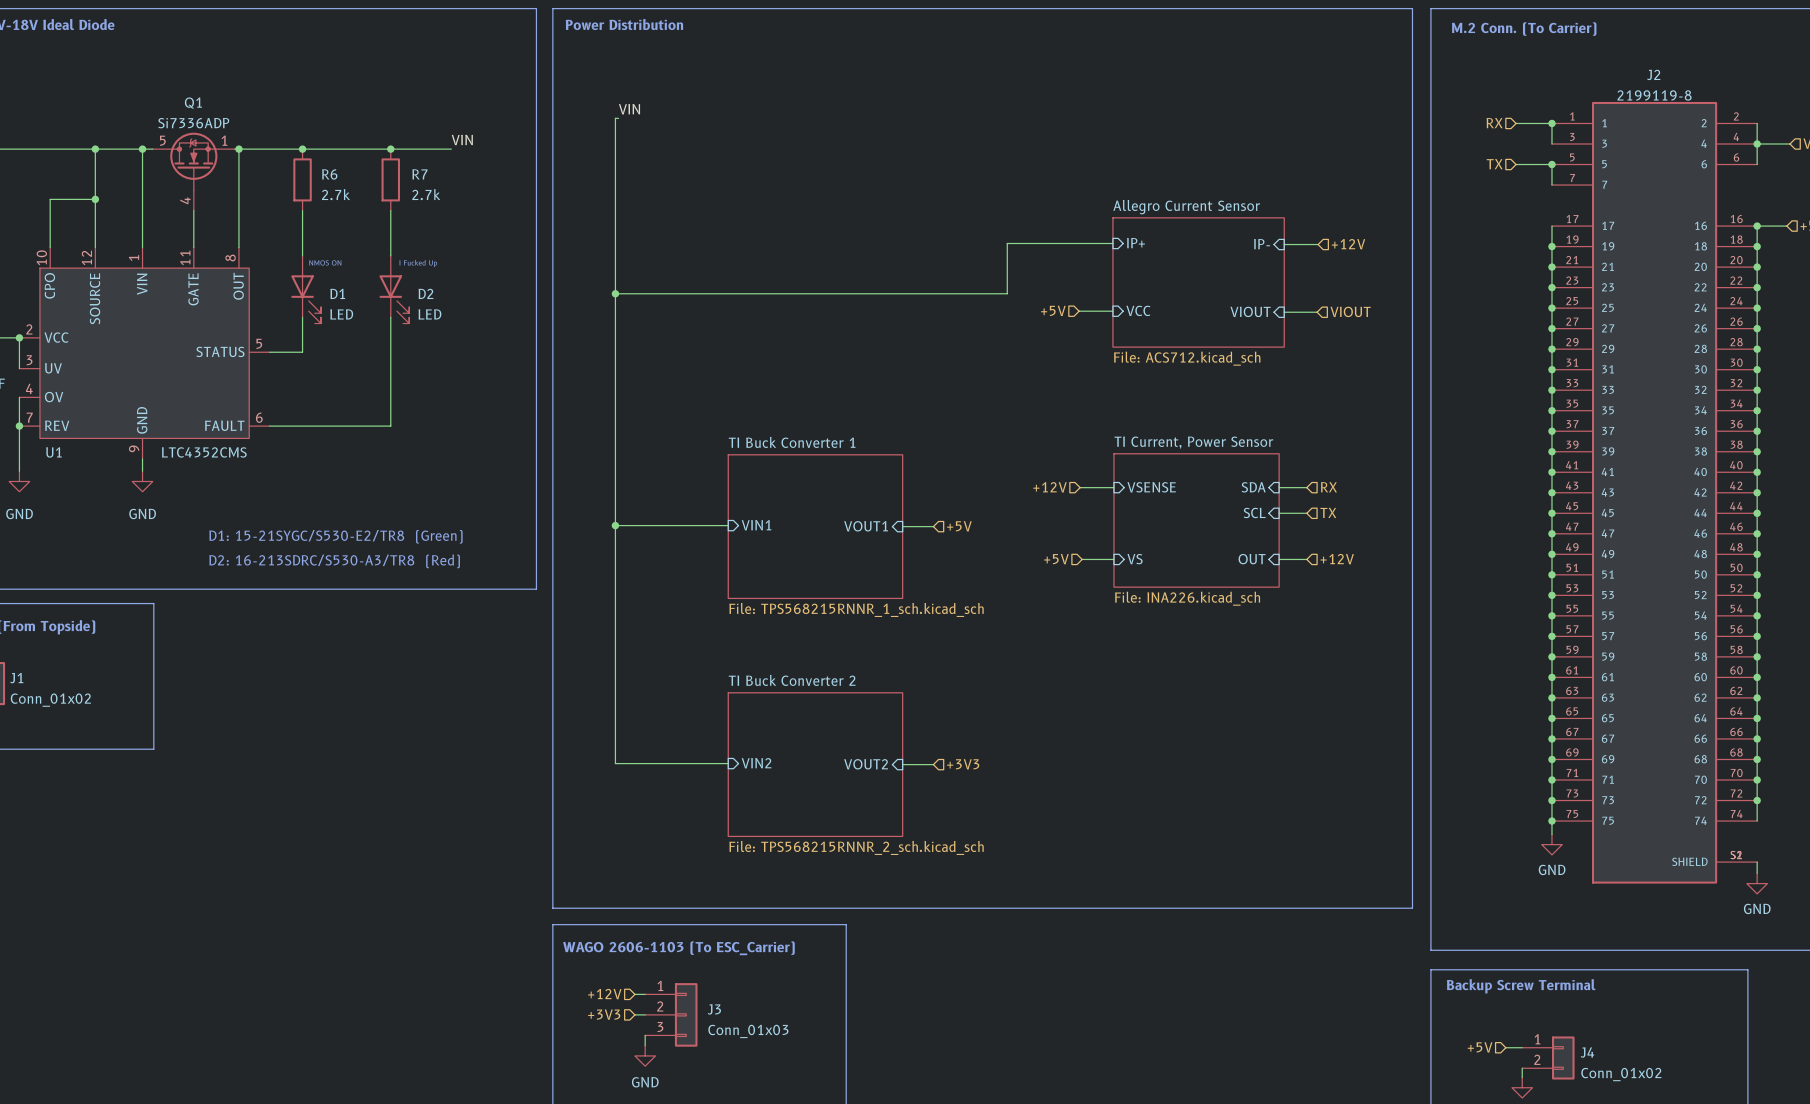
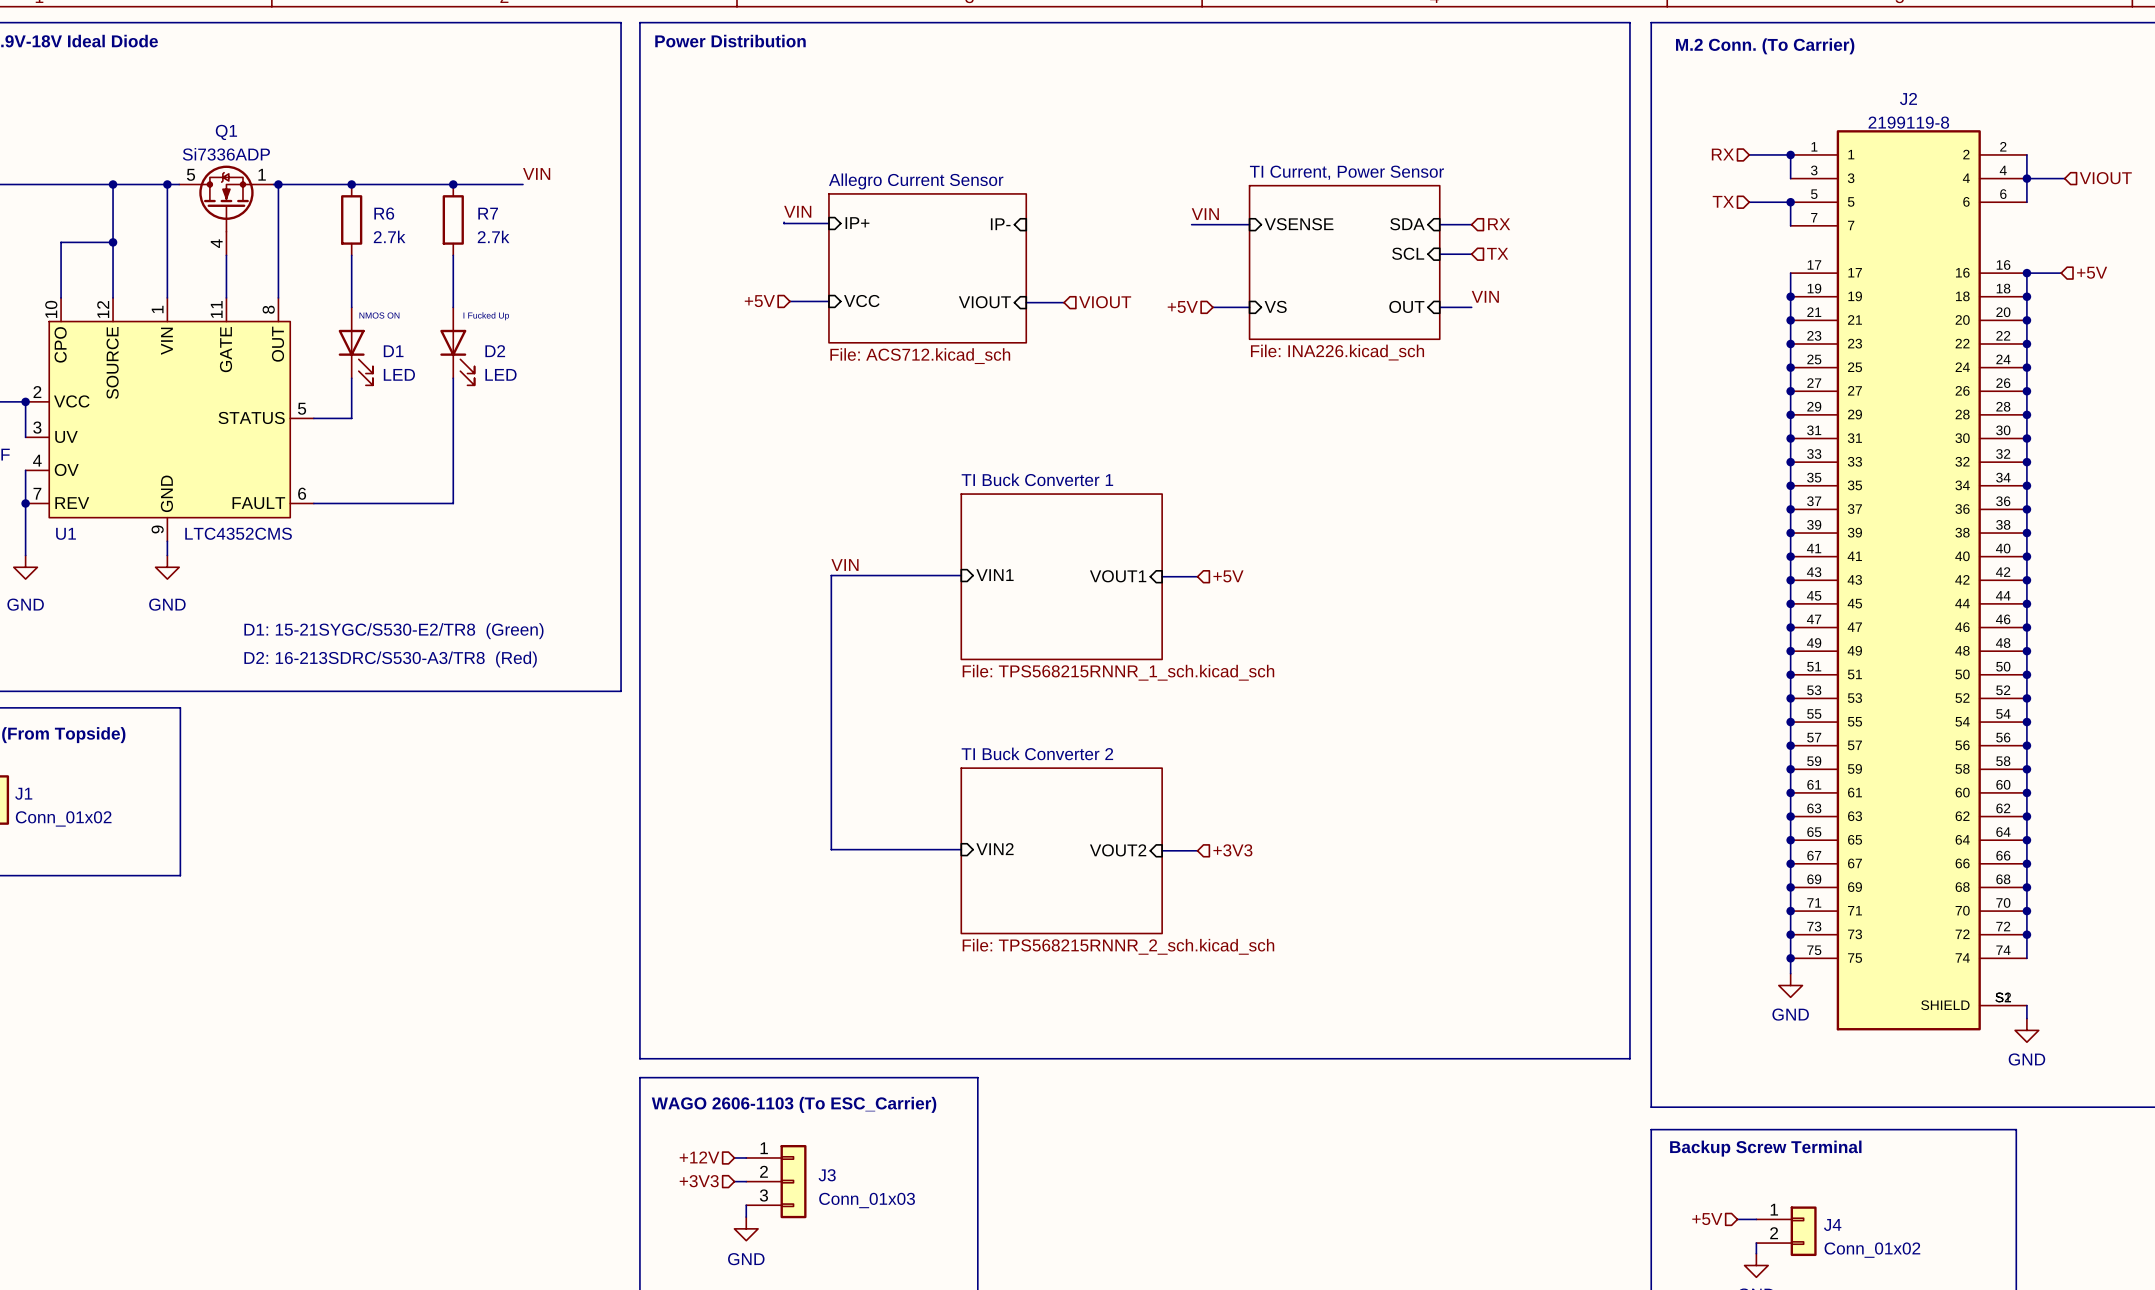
label position: VIN (629, 109) -> VIN (797, 211)
wire: (618, 118) (615, 118) (615, 763) (728, 763) -> none
label: none -> VIN (1205, 214)
wire: none -> (784, 222) (828, 223)
sheet pin: none -> IP+ (857, 223)
sheet pin: none -> IP- (1000, 224)
sheet pin: none -> VSENSE (1299, 224)
sheet pin: none -> SDA (1407, 224)
hierarchical label: none -> RX (1499, 224)
wire: none -> (1191, 224) (1249, 224)
wire: none -> (1439, 224) (1471, 224)
sheet pin: none -> SCL (1408, 253)
wire: none -> (1439, 254) (1471, 254)
hierarchical label: none -> TX (1497, 253)
sheet TI Current, Power Sensor: none -> File: INA226.kicad_sch (1344, 262)
sheet Allegro Current Sensor: none -> File: ACS712.kicad_sch (927, 268)
wire: (1112, 243) (1007, 243) (1007, 293) (615, 293) -> none
sheet pin: IP+ (1135, 243) -> none
sheet pin: IP- (1261, 244) -> none
wire: (1284, 244) (1318, 244) -> none
hierarchical label: +12V (1348, 244) -> none
label: none -> VIN (1485, 296)
hierarchical label: none -> +5V (759, 301)
wire: none -> (789, 301) (828, 301)
sheet pin: none -> VCC (861, 301)
sheet pin: none -> VIOUT (984, 302)
wire: none -> (1026, 302) (1064, 302)
hierarchical label: none -> VIOUT (1105, 302)
wire: none -> (1212, 307) (1249, 307)
sheet pin: none -> VS (1275, 306)
sheet pin: none -> OUT (1406, 306)
wire: none -> (1439, 307) (1471, 307)
sheet Allegro Current Sensor: File: ACS712.kicad_sch (1198, 282) -> none
junction: (615, 293) -> none
hierarchical label position: +5V (1053, 310) -> +5V (1182, 307)
sheet pin: VCC (1138, 310) -> none
wire: (1079, 311) (1112, 311) -> none
sheet pin: VIOUT (1250, 311) -> none
hierarchical label: VIOUT (1350, 311) -> none
wire: (1284, 312) (1317, 312) -> none
label: none -> VIN (844, 565)
hierarchical label: +12V (1050, 487) -> none
wire: (1080, 487) (1113, 487) -> none
sheet pin: VSENSE (1151, 487) -> none
sheet pin: SDA (1253, 487) -> none
wire: (1279, 487) (1306, 487) -> none
hierarchical label: RX (1328, 487) -> none
wire: none -> (961, 575) (831, 575) (831, 849) (961, 849)
hierarchical label: none -> +5V (1228, 576)
sheet pin: SCL (1254, 512) -> none
hierarchical label: TX (1328, 512) -> none
wire: (1279, 513) (1306, 513) -> none
sheet TI Current, Power Sensor: File: INA226.kicad_sch (1196, 520) -> none
wire: (615, 525) (728, 525) -> none
junction: (615, 525) -> none
sheet pin position: VIN1 (756, 525) -> VIN1 (995, 575)
sheet TI Buck Converter 1 position: (815, 526) -> (1061, 576)
sheet pin position: VOUT1 (866, 526) -> VOUT1 (1118, 576)
wire: (902, 526) (933, 526) -> (1162, 576) (1197, 576)
hierarchical label: +5V (959, 526) -> none
hierarchical label: +5V (1056, 559) -> none
wire: (1082, 559) (1113, 559) -> none
sheet pin: VS (1135, 559) -> none
sheet pin: OUT (1252, 559) -> none
wire: (1279, 559) (1306, 559) -> none
hierarchical label: +12V (1337, 559) -> none
sheet pin position: VIN2 (756, 763) -> VIN2 (994, 849)
sheet TI Buck Converter 2 position: (815, 764) -> (1061, 850)
sheet pin position: VOUT2 (866, 764) -> VOUT2 (1118, 850)
wire: (902, 764) (933, 764) -> (1162, 850) (1197, 850)
hierarchical label position: +3V3 (963, 764) -> +3V3 (1232, 850)

